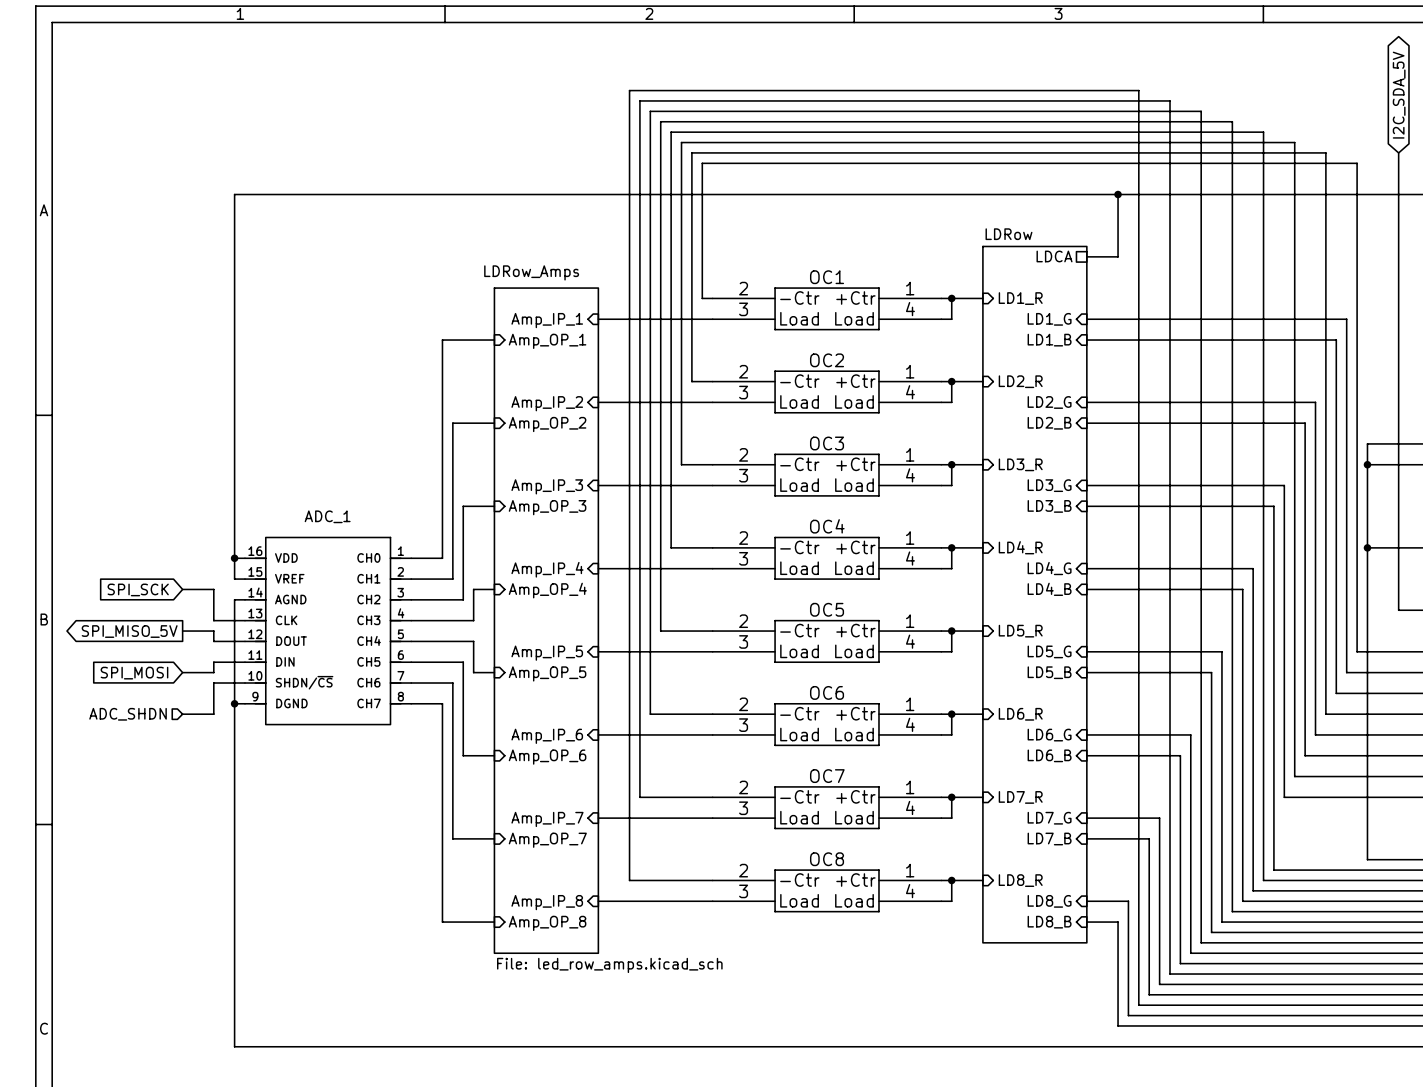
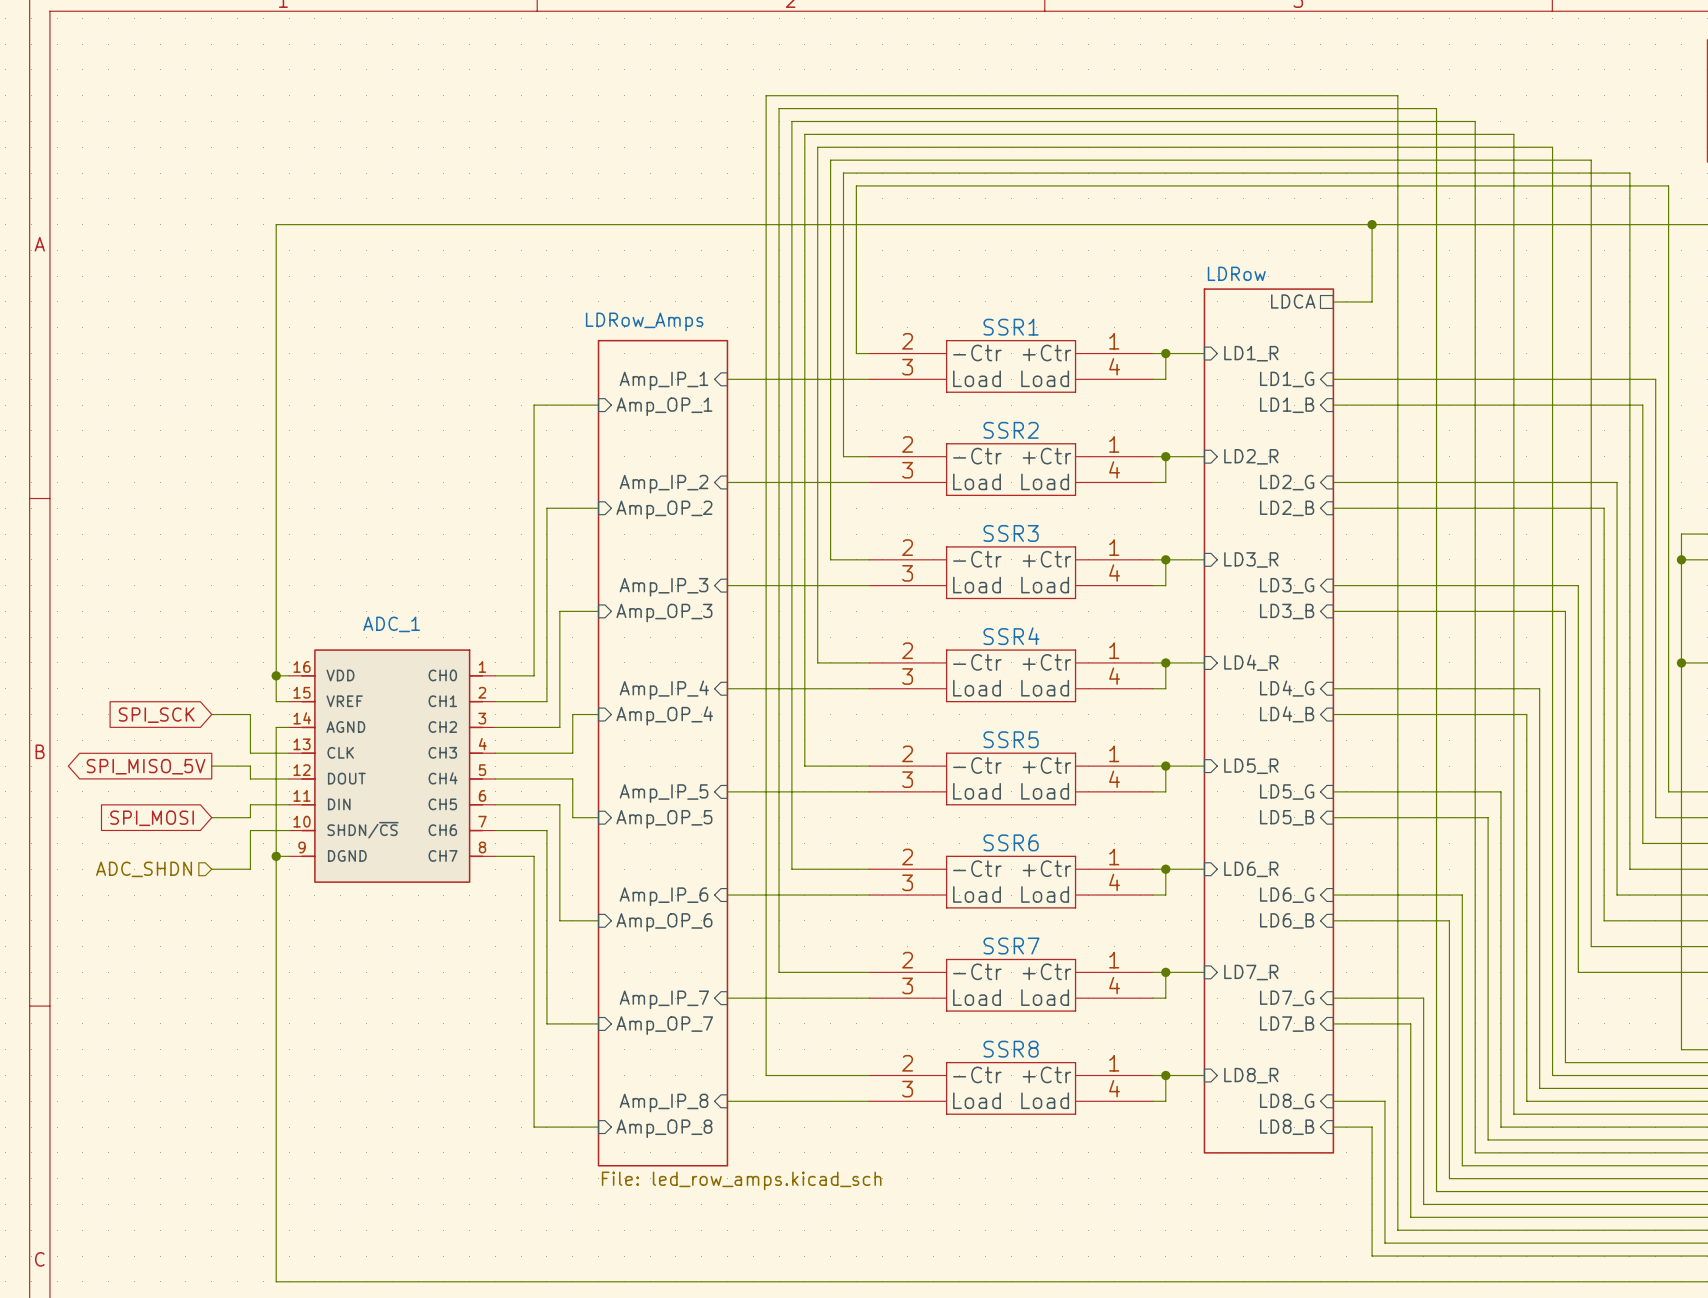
OC1 name: OC1 (827, 277) -> SSR1 (1011, 327)
OC2 name: OC2 (827, 360) -> SSR2 (1011, 430)
OC3 name: OC3 (827, 443) -> SSR3 (1011, 533)
OC4 name: OC4 (827, 526) -> SSR4 (1011, 636)
OC5 name: OC5 (827, 609) -> SSR5 (1011, 739)
OC6 name: OC6 (827, 692) -> SSR6 (1011, 842)
OC7 name: OC7 (827, 776) -> SSR7 (1011, 946)
OC8 name: OC8 (827, 859) -> SSR8 (1011, 1049)

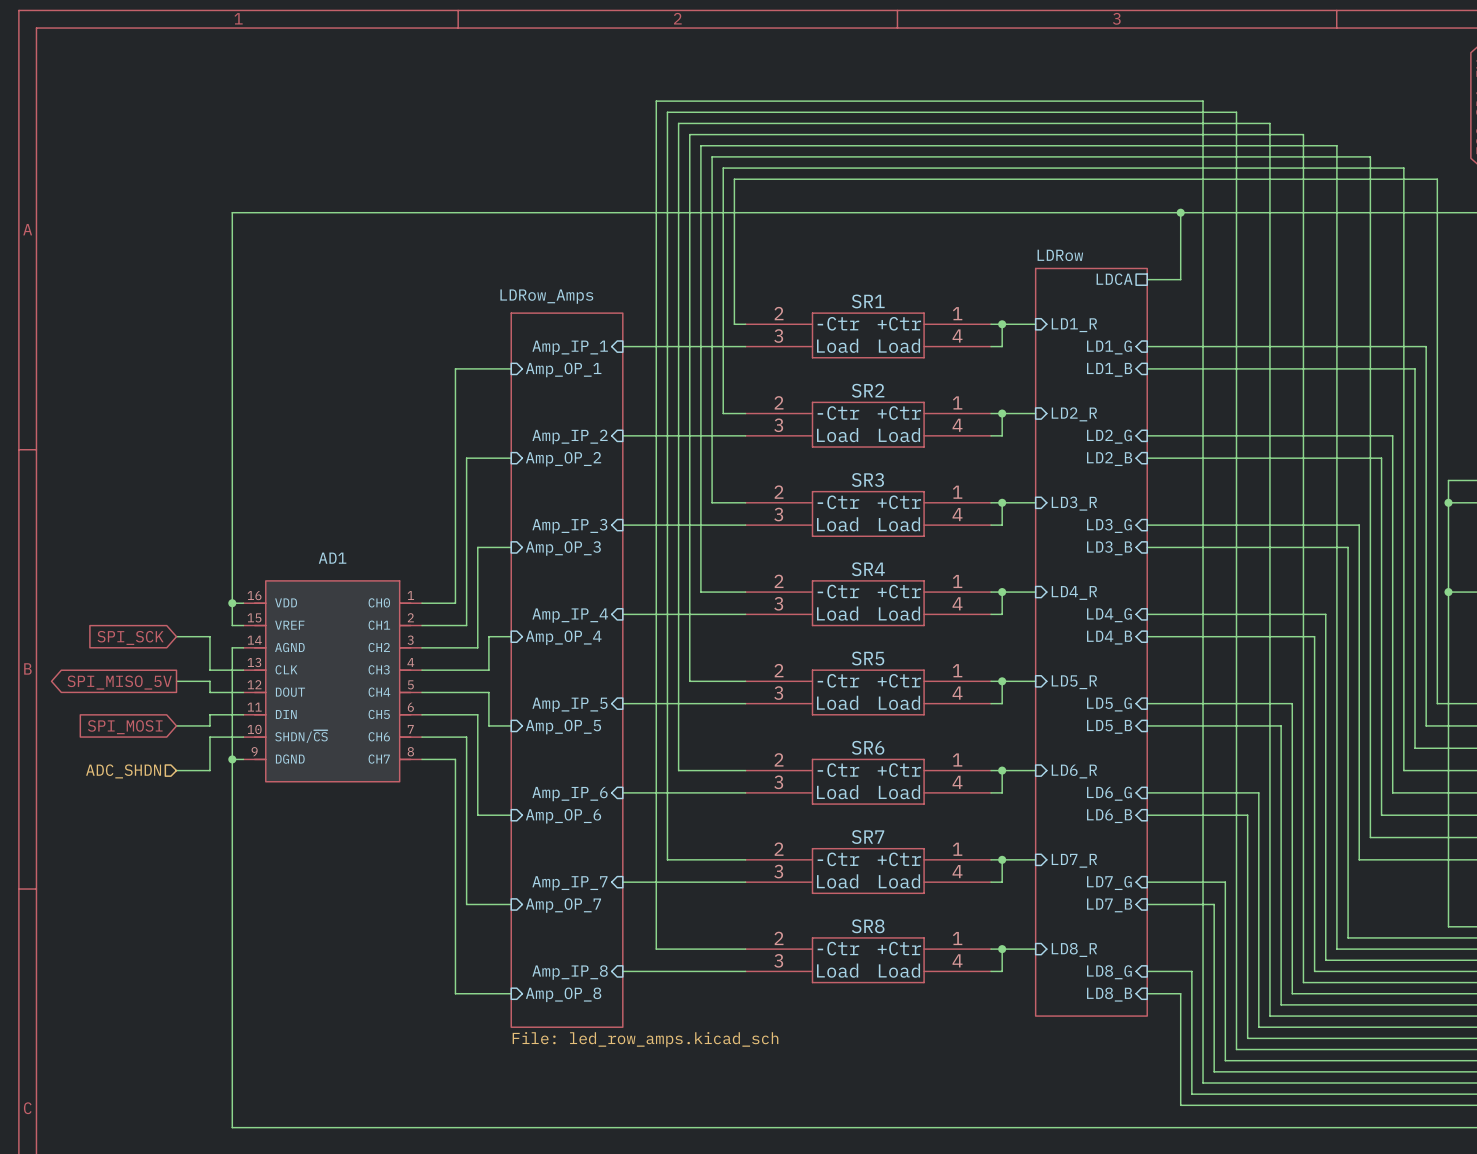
SSR1 name: SSR1 (1011, 327) -> SR1 (868, 301)
SSR2 name: SSR2 (1011, 430) -> SR2 (868, 390)
SSR3 name: SSR3 (1011, 533) -> SR3 (867, 479)
ADC_1 name: ADC_1 (391, 624) -> AD1 (332, 558)
SSR4 name: SSR4 (1011, 636) -> SR4 (868, 569)
SSR5 name: SSR5 (1011, 739) -> SR5 (868, 658)
SSR6 name: SSR6 (1011, 842) -> SR6 (868, 747)
SSR7 name: SSR7 (1011, 946) -> SR7 (868, 837)
SSR8 name: SSR8 (1011, 1049) -> SR8 (868, 926)

